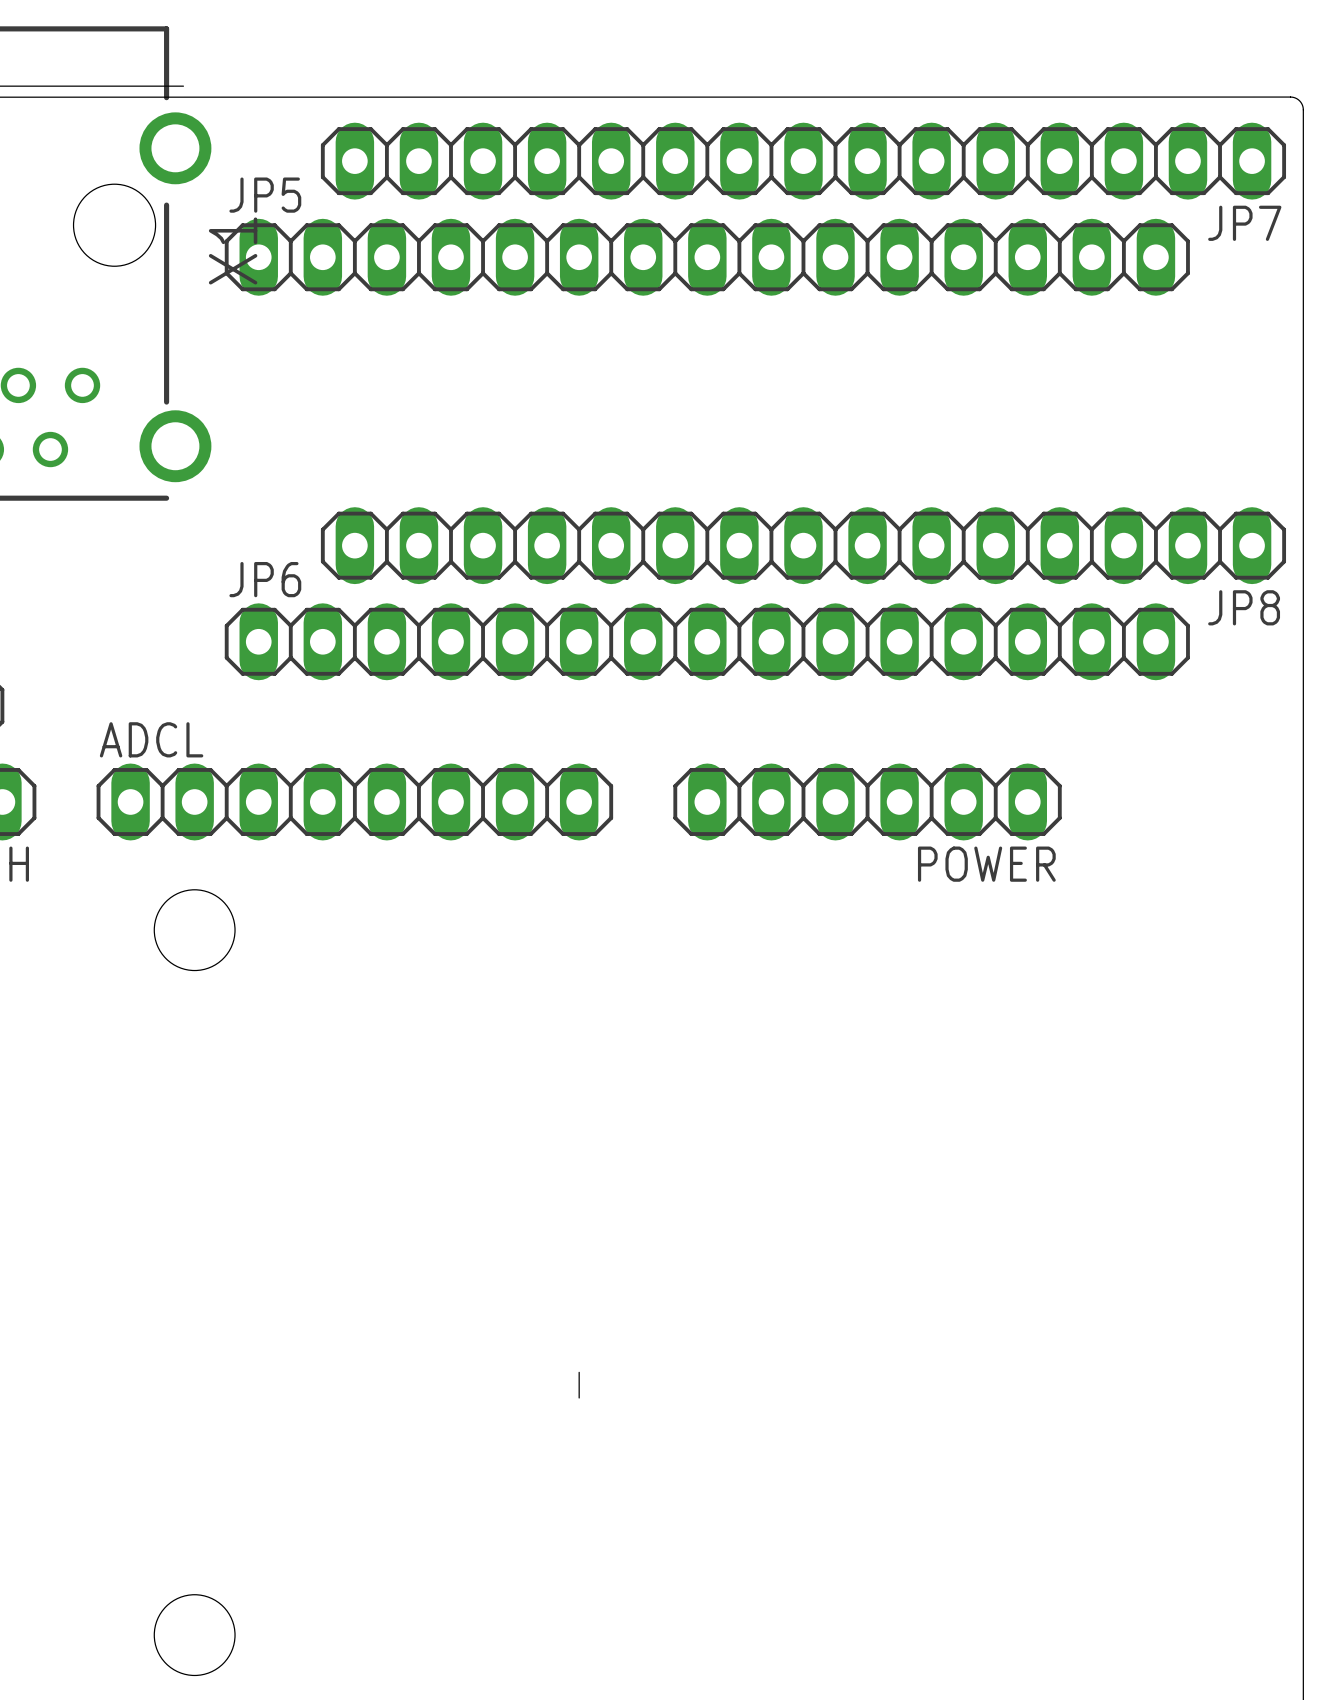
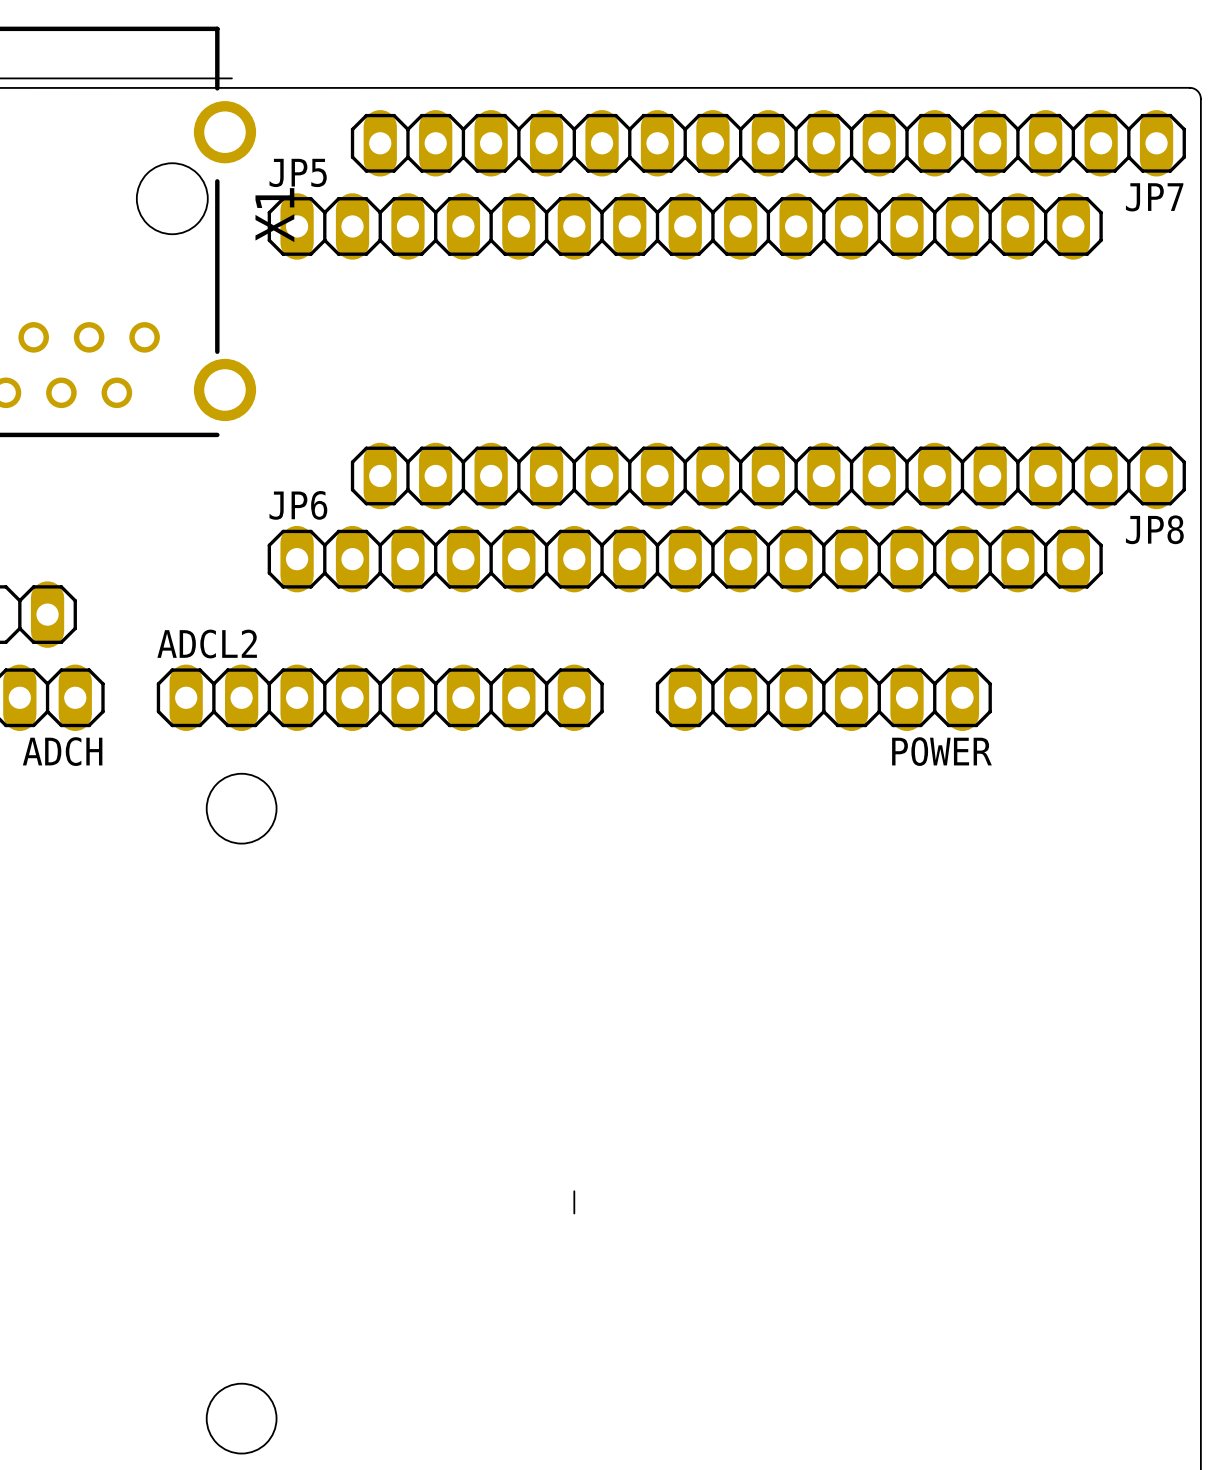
ADCL name: ADCL (151, 739) -> ADCL2 (207, 644)

